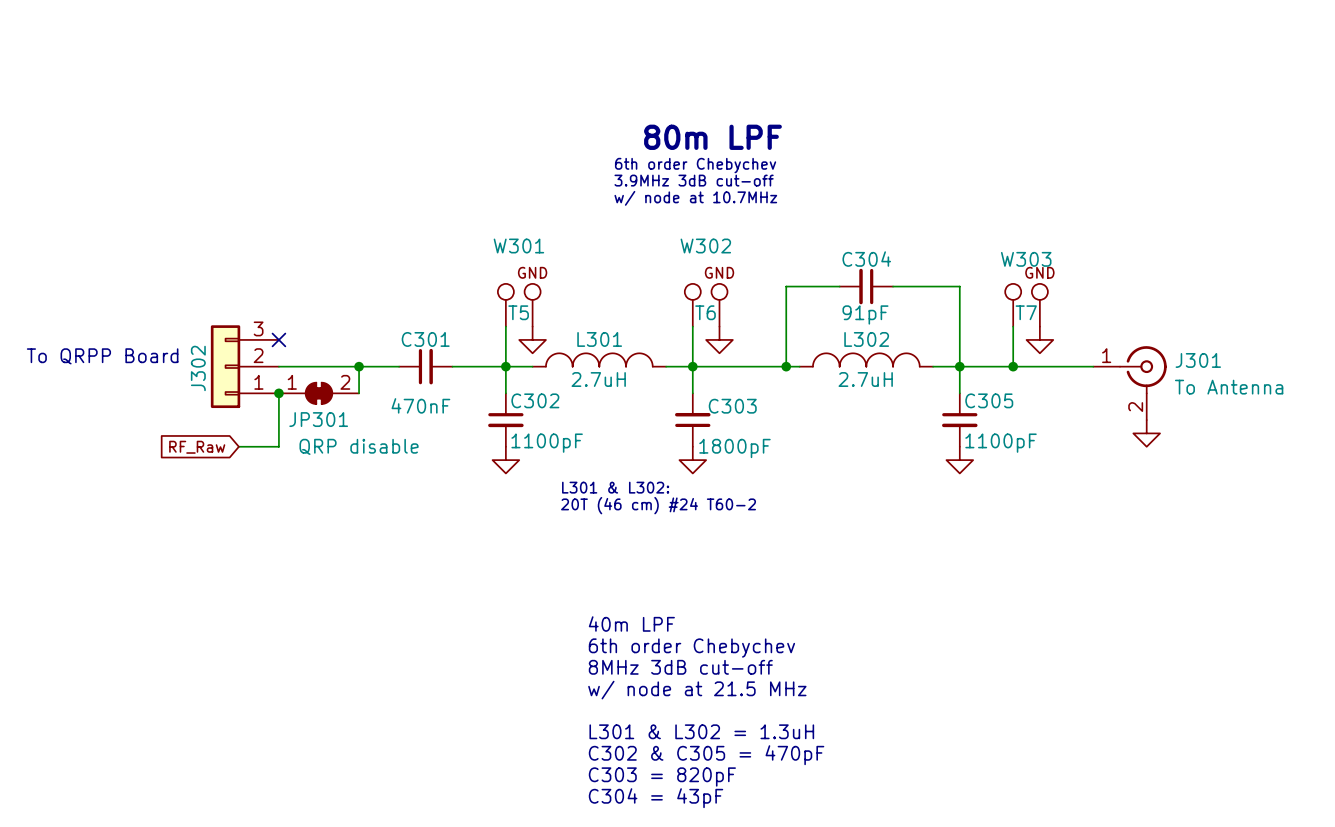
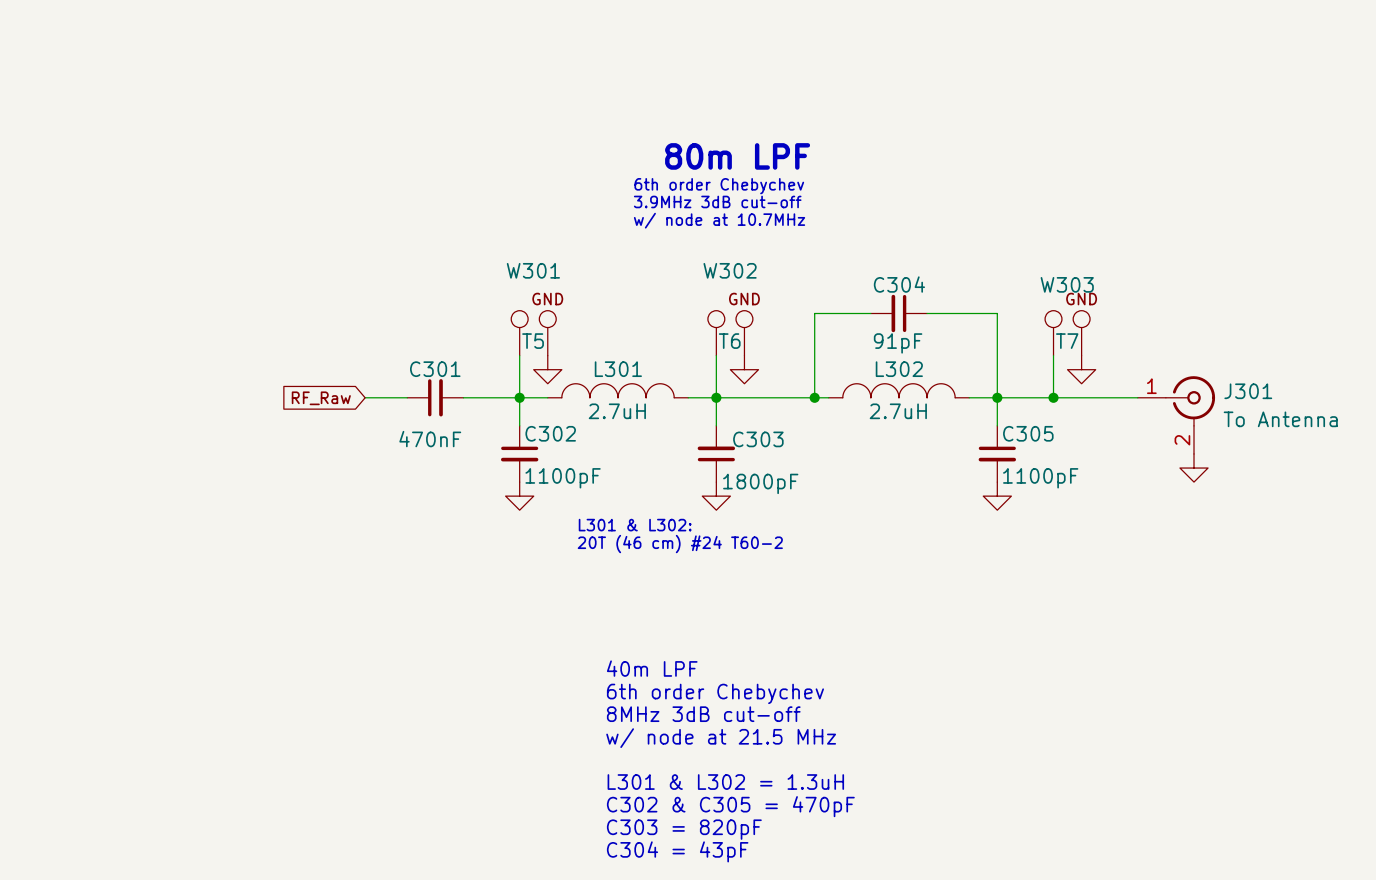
no-connect mark: (278, 339) -> none
text: To QRPP Board (102, 356) -> none
J302: (244, 366) -> none
wire: (278, 366) (359, 366) (359, 393) -> none
junction: (359, 366) -> none
wire: (278, 393) (278, 446) (238, 446) -> none
junction: (278, 393) -> none
JP301: QRP disable (318, 393) -> none
global label position: RF_Raw (197, 447) -> RF_Raw (321, 398)

